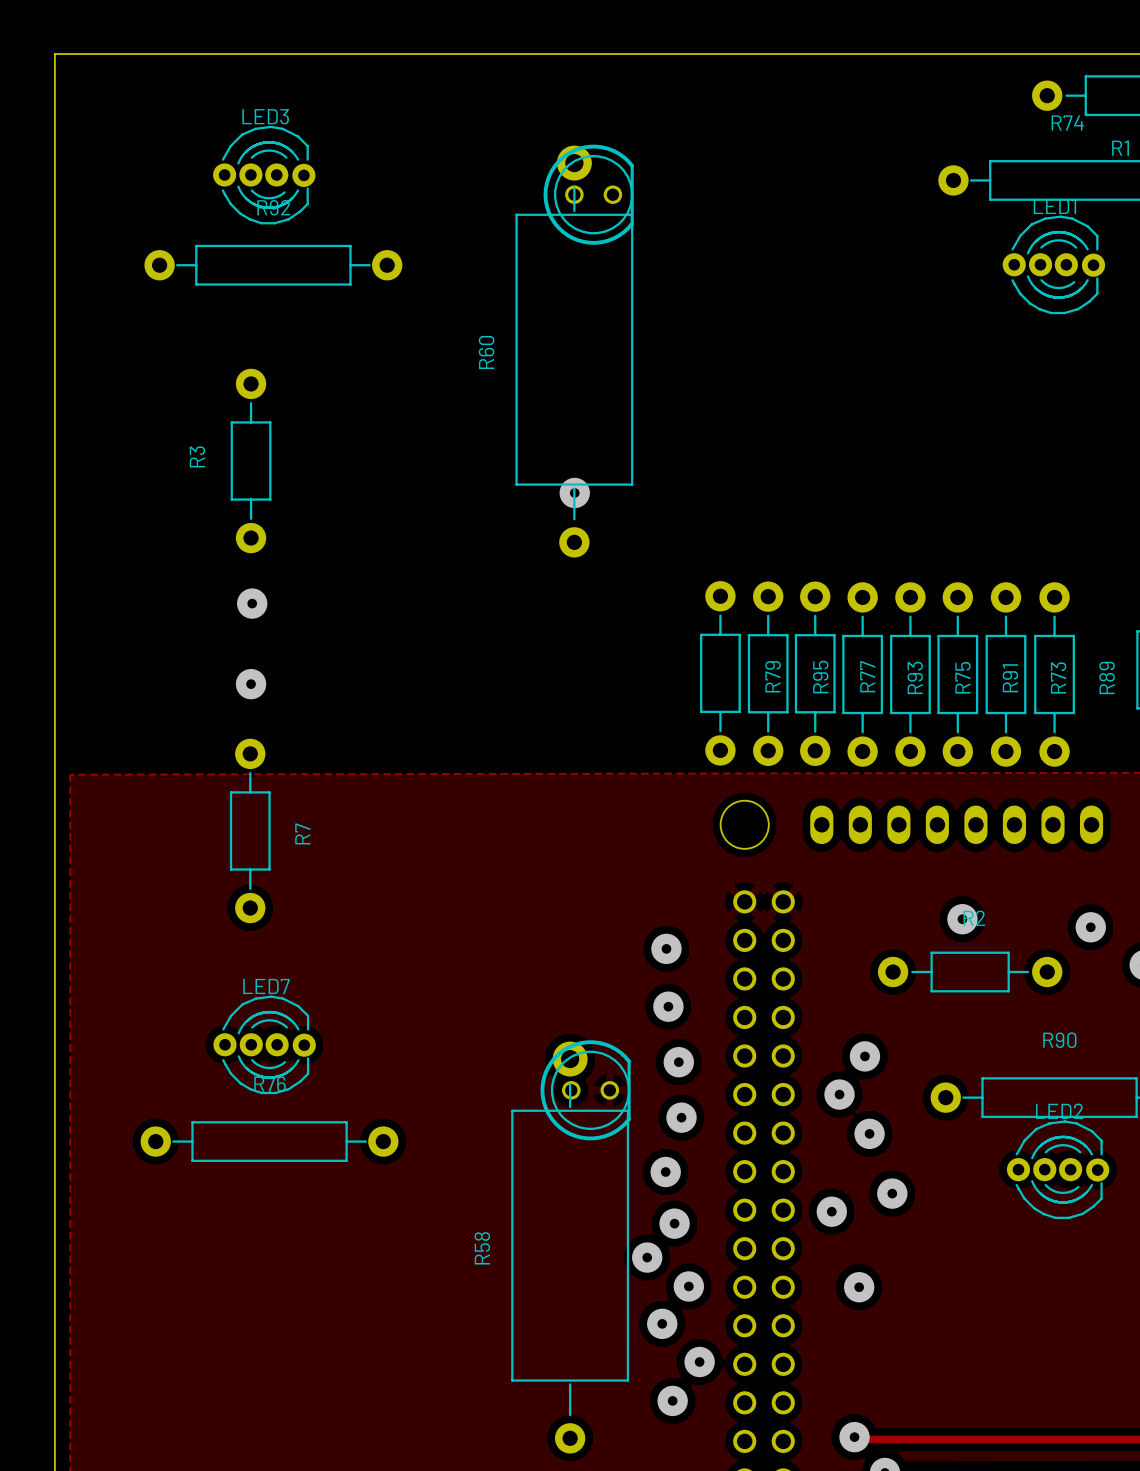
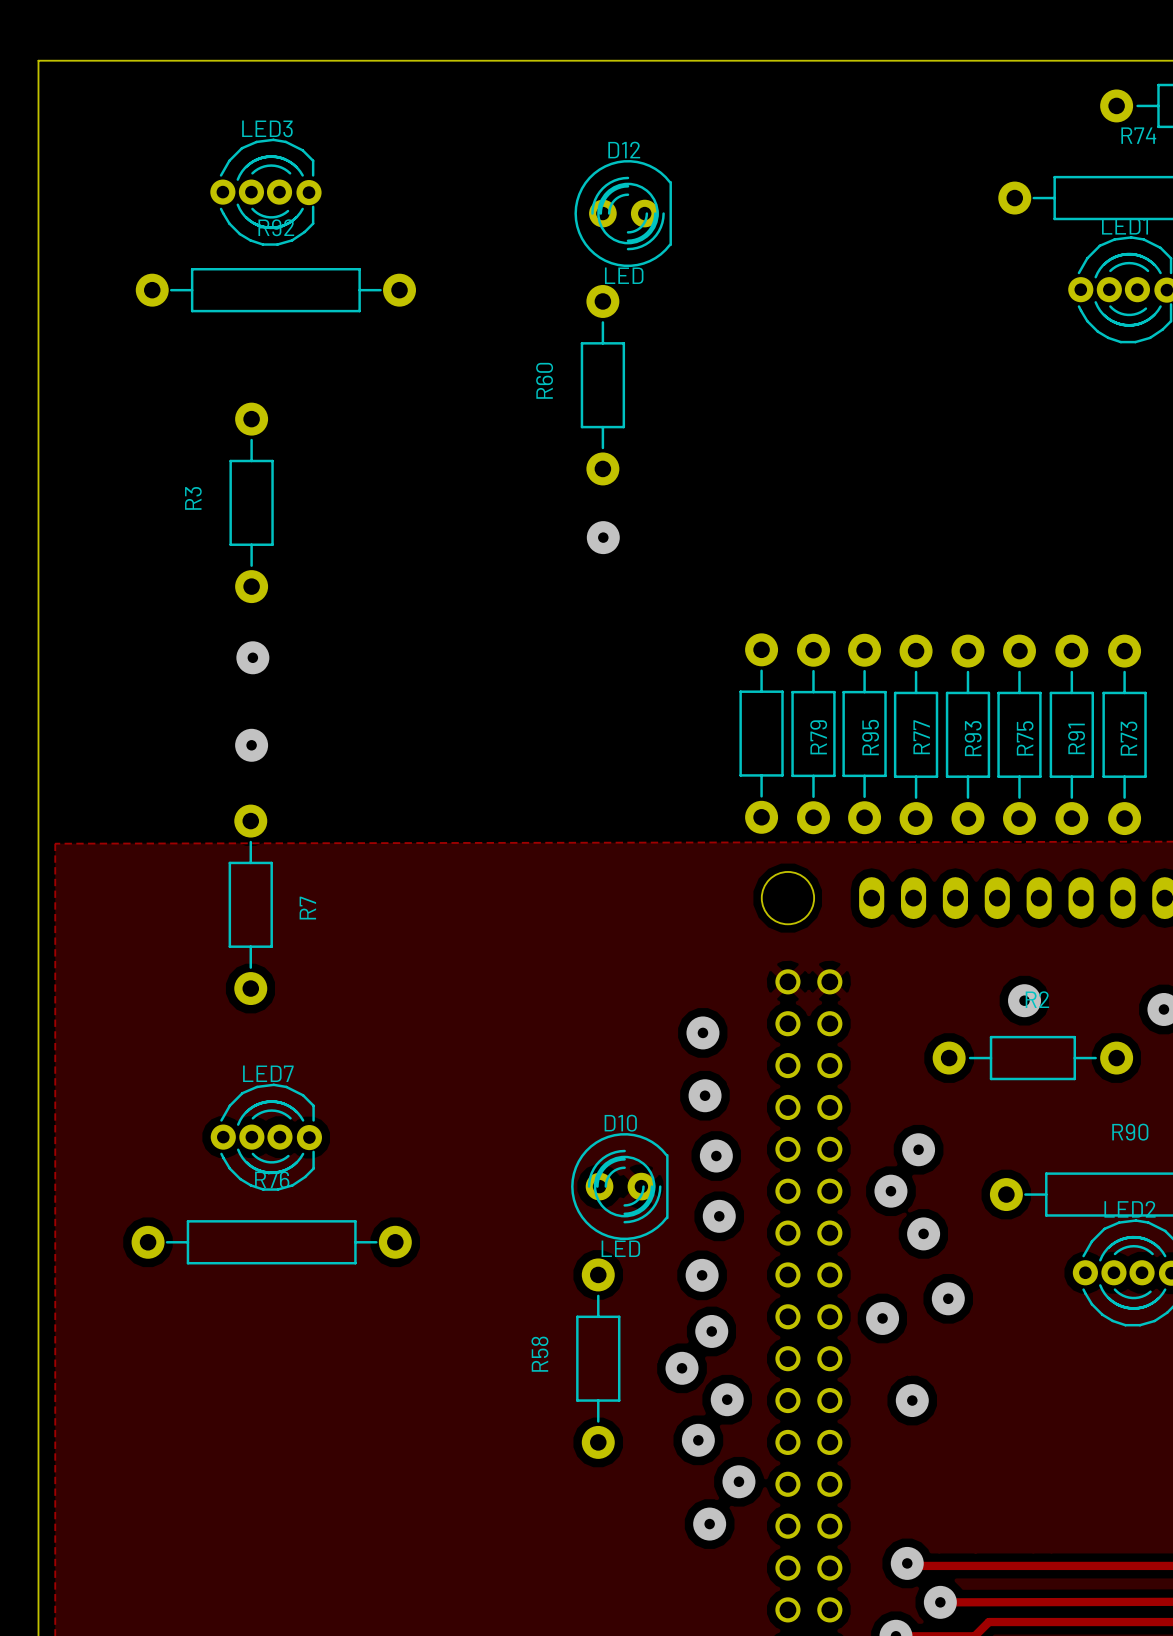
R60 footprint: [515, 145, 634, 558] -> [580, 284, 626, 486]
part: (588, 194) -> none
D12: none -> LED (623, 213)
R60 name position: R60 (486, 352) -> R60 (544, 380)
R58 footprint: [511, 1041, 630, 1454] -> [576, 1258, 621, 1459]
part: (585, 1090) -> none
D10: none -> LED (619, 1186)
R58 name position: R58 (482, 1248) -> R58 (539, 1354)

